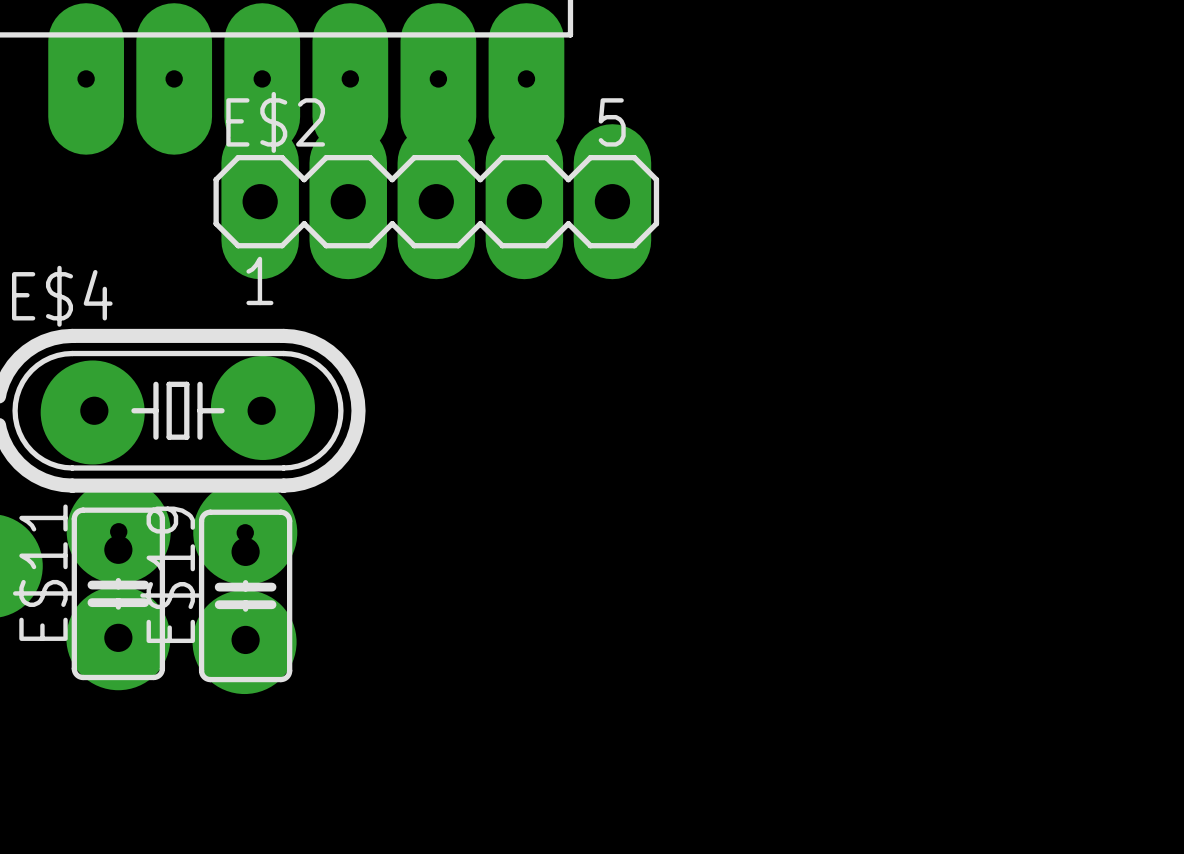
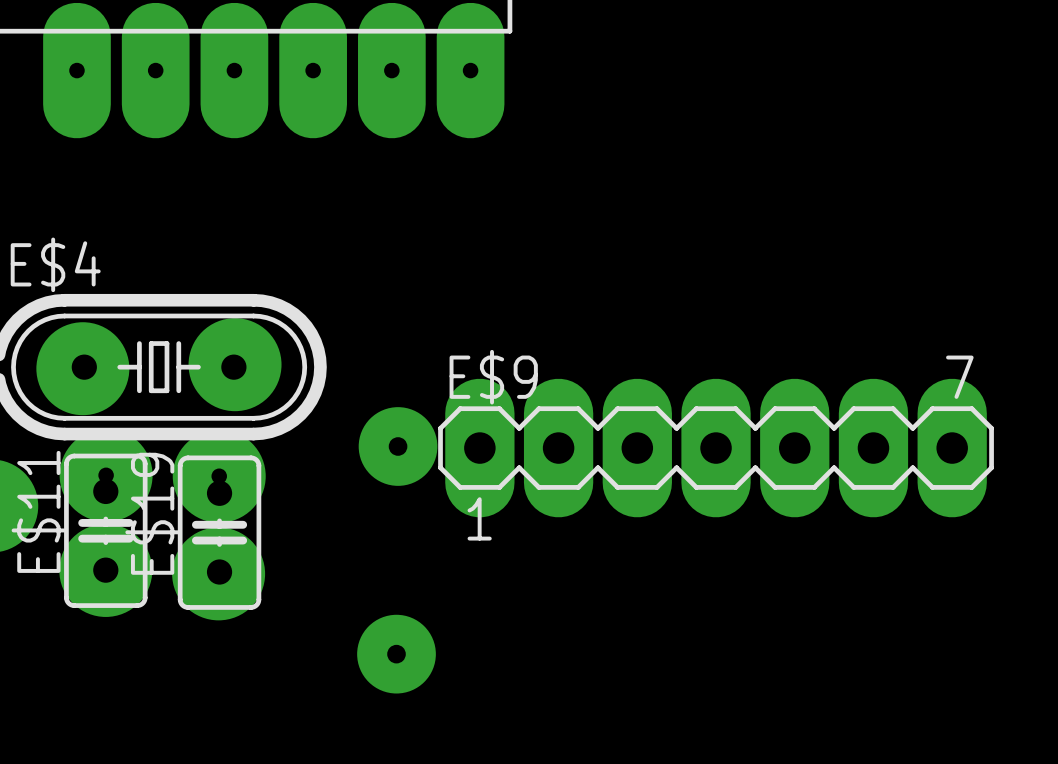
E$2: (436, 201) -> none
via: none -> (398, 446)
E$9: none -> (716, 448)
via: none -> (396, 654)

